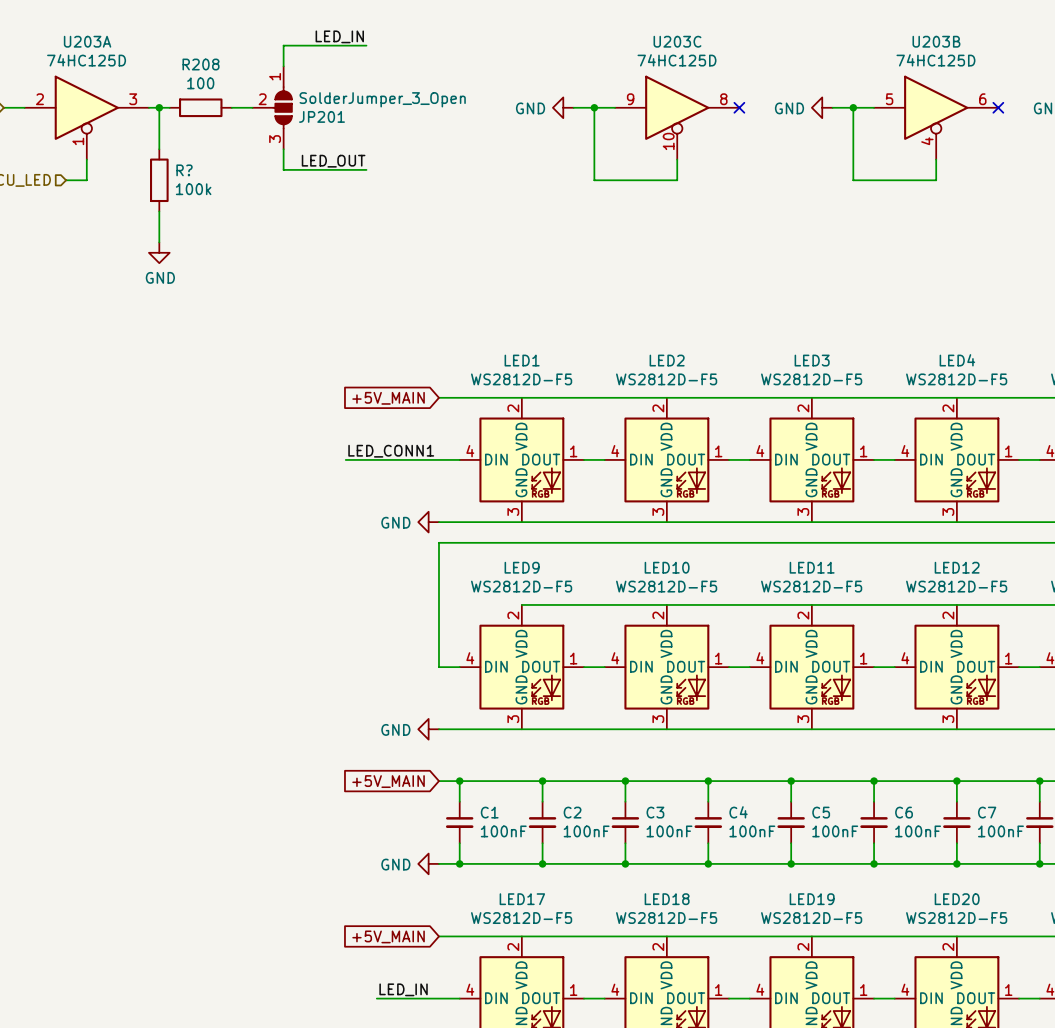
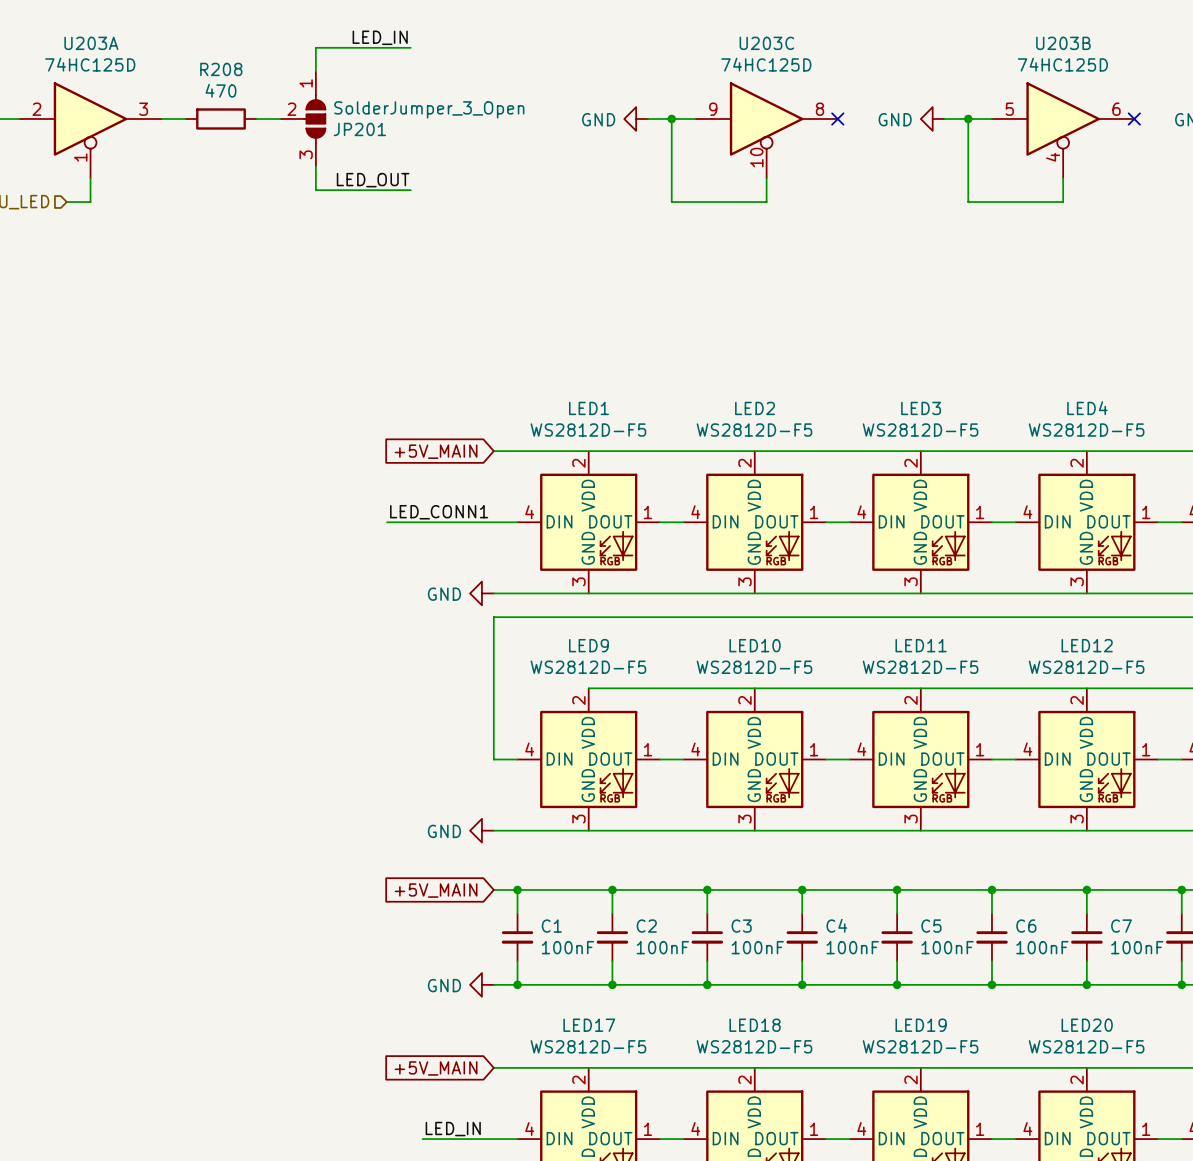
R208 value: 100 (200, 83) -> 470 (221, 90)
wire: (159, 107) (159, 149) -> none
junction: (159, 107) -> none
R?: 100k (159, 180) -> none
wire: (159, 211) (159, 242) -> none
power symbol: GND (159, 252) -> none

